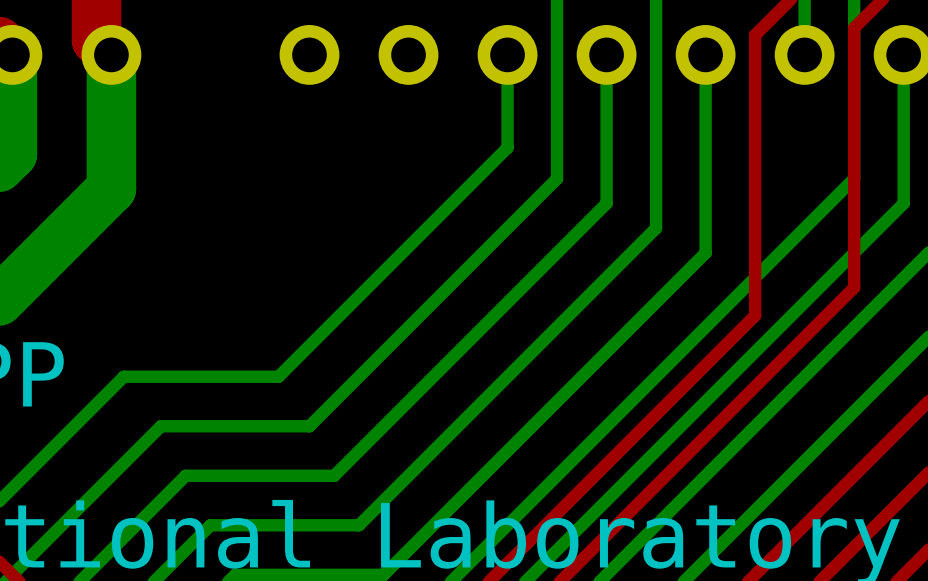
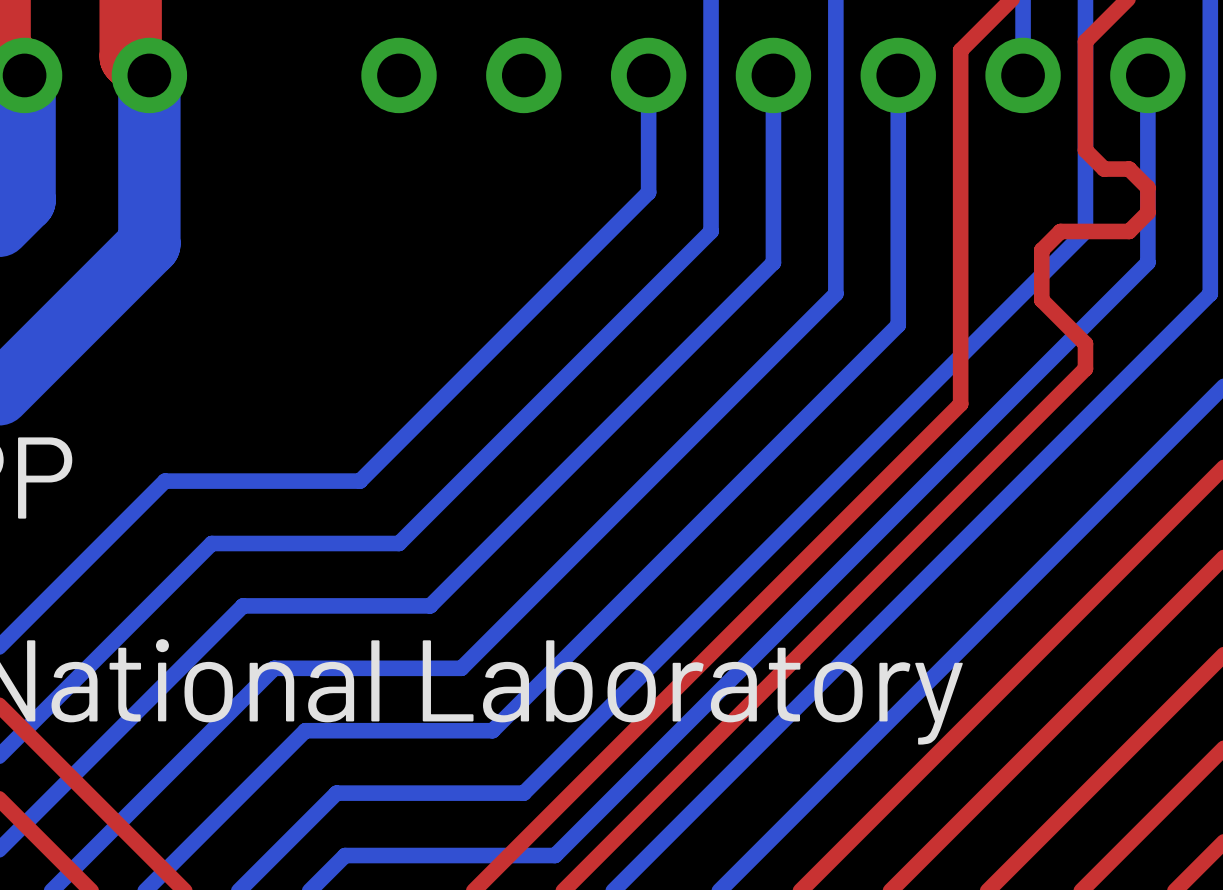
top track: (854, 114) (854, 267) -> (1085, 150) (1104, 169) (1129, 169) (1147, 187) (1147, 212) (1129, 231) (1060, 231) (1041, 250) (1041, 300) (1085, 343)

